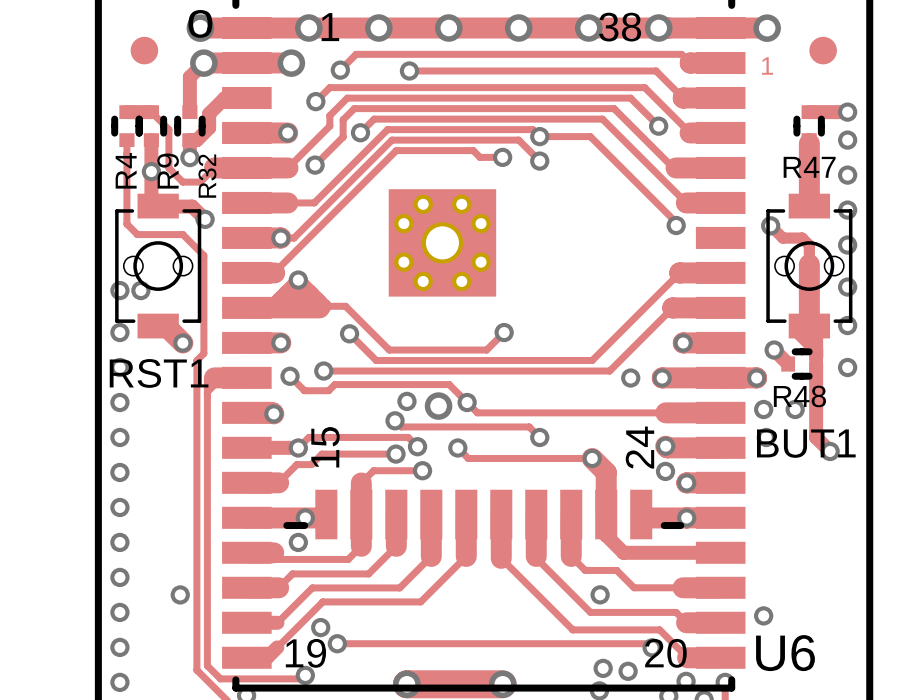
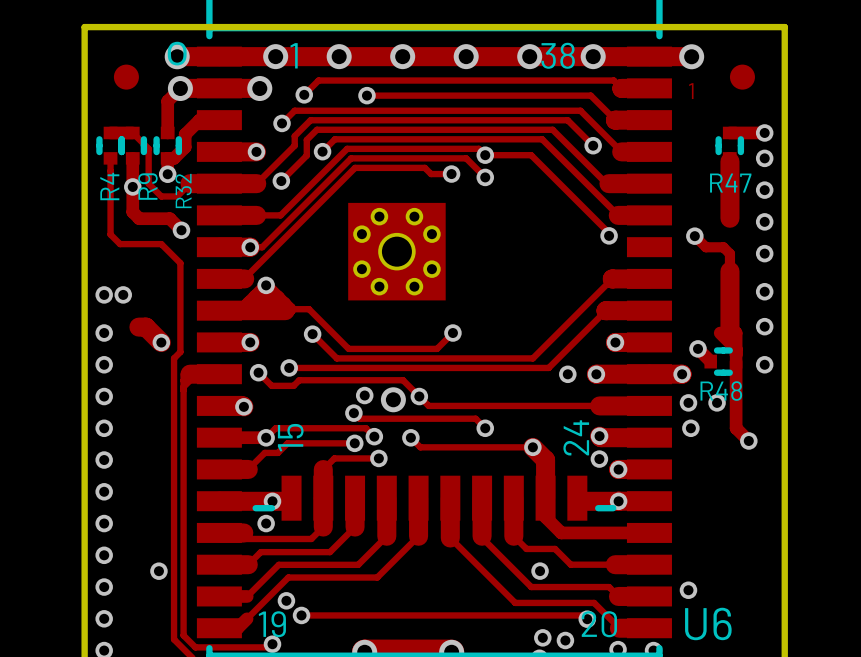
RST1: (158, 266) -> none
BUT1: (809, 266) -> none

